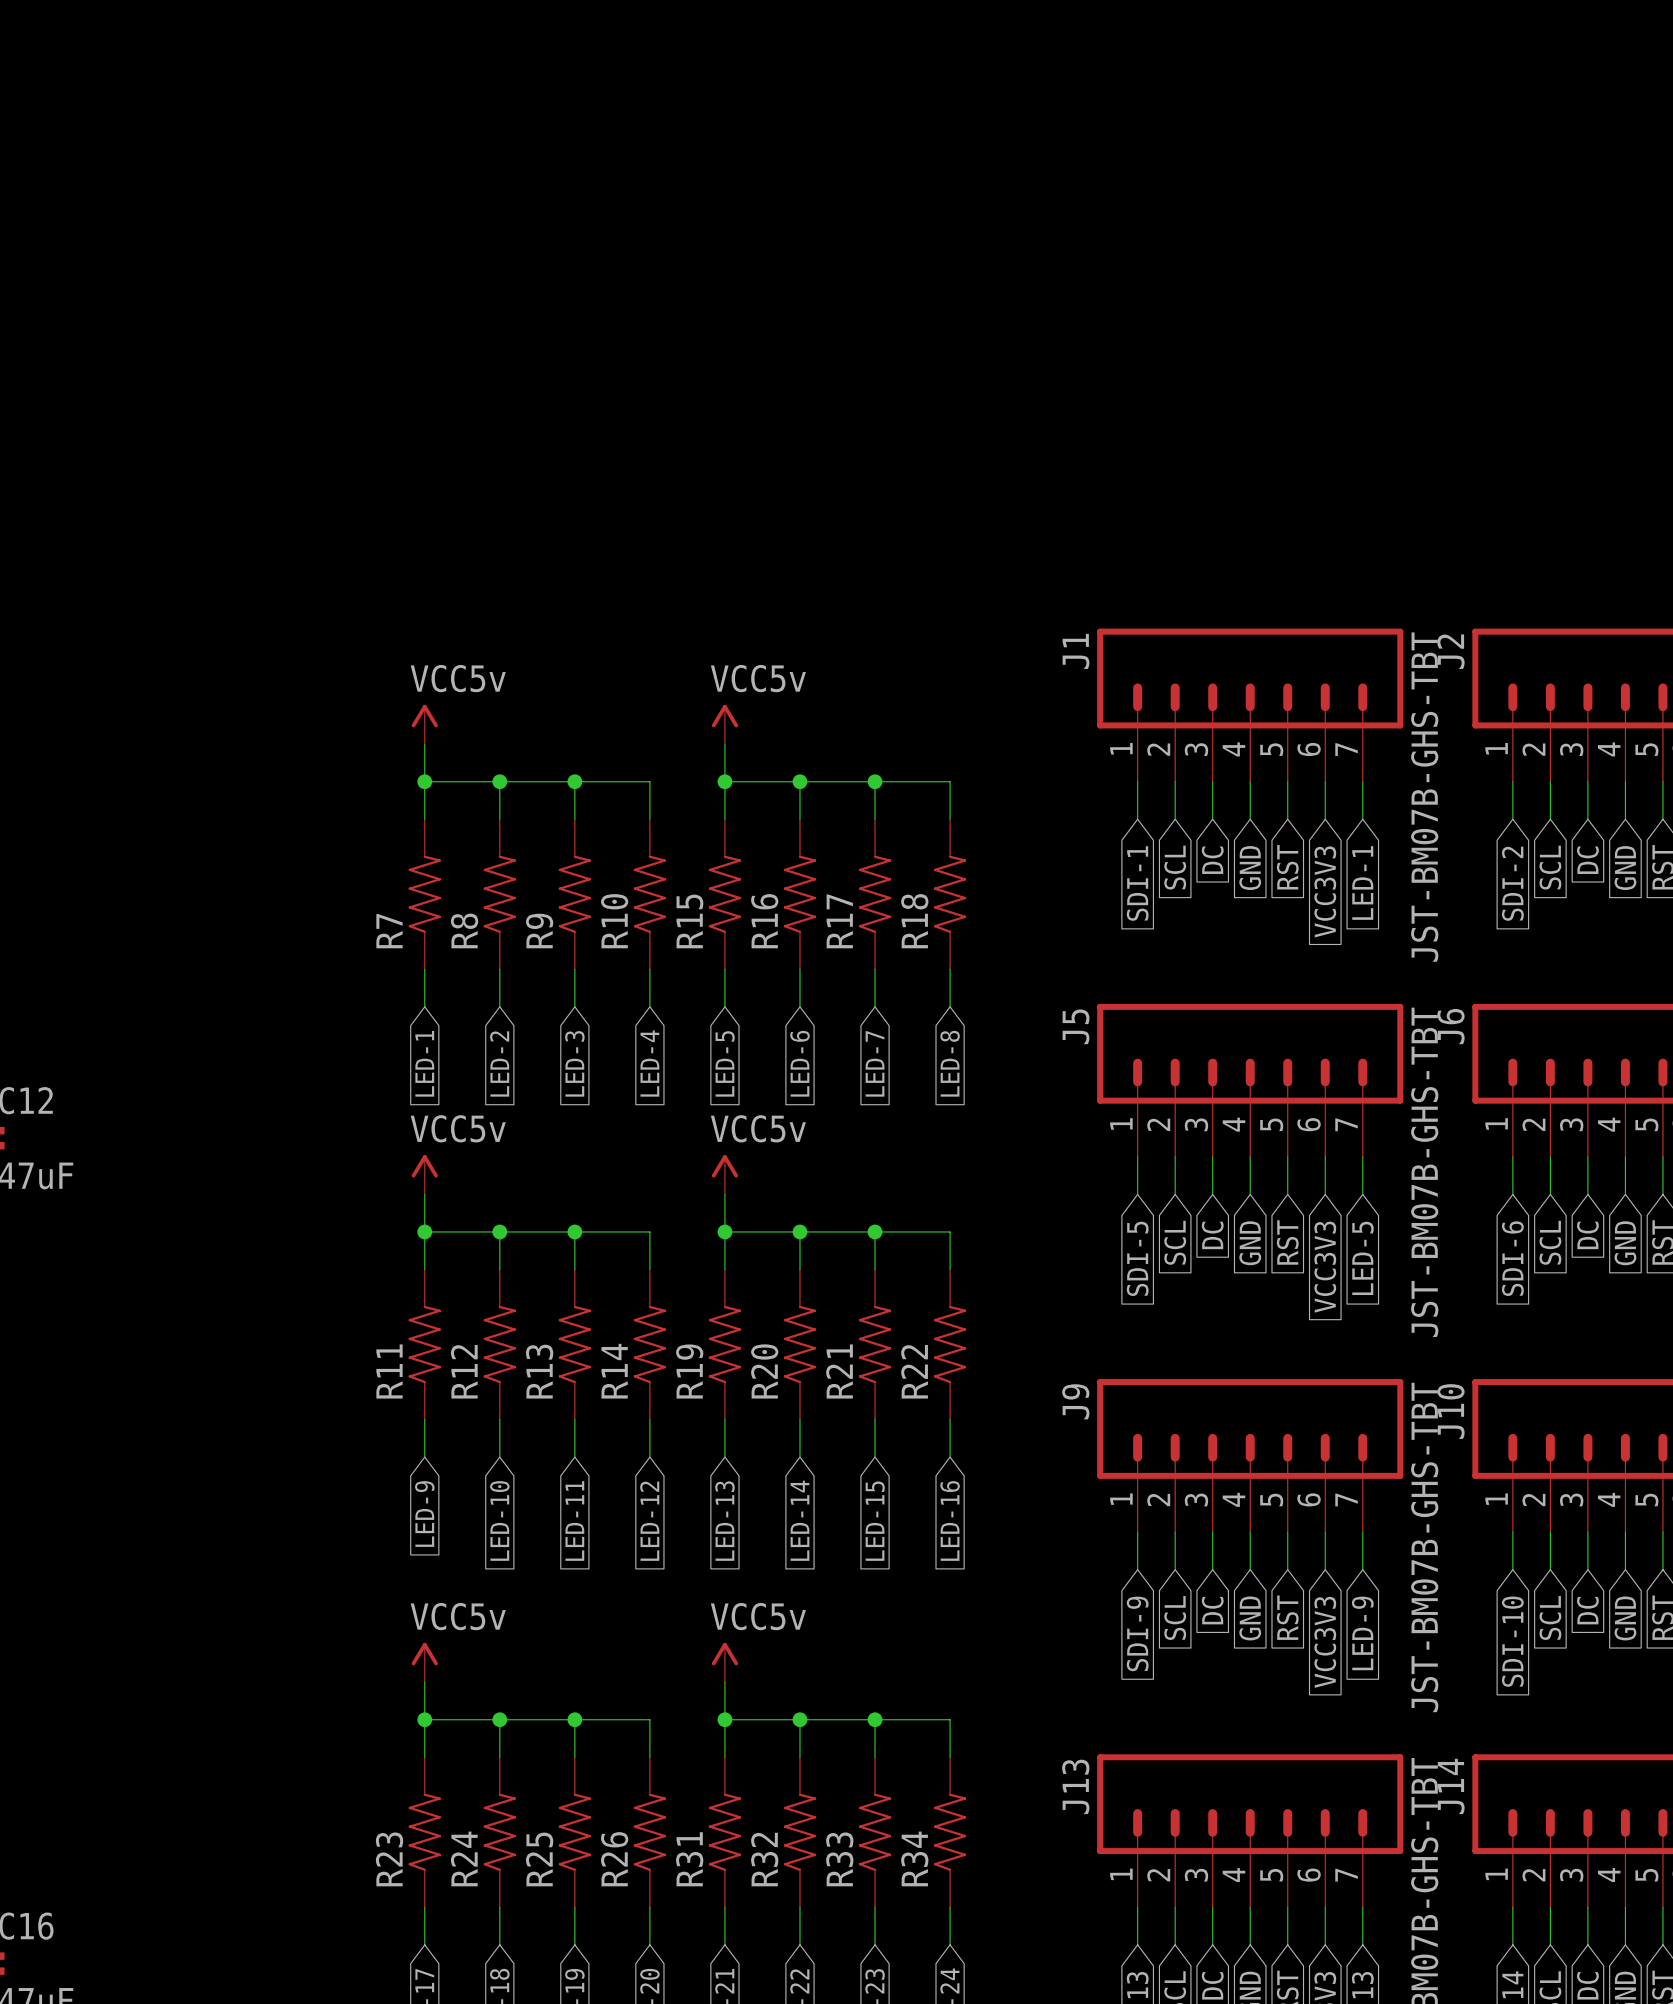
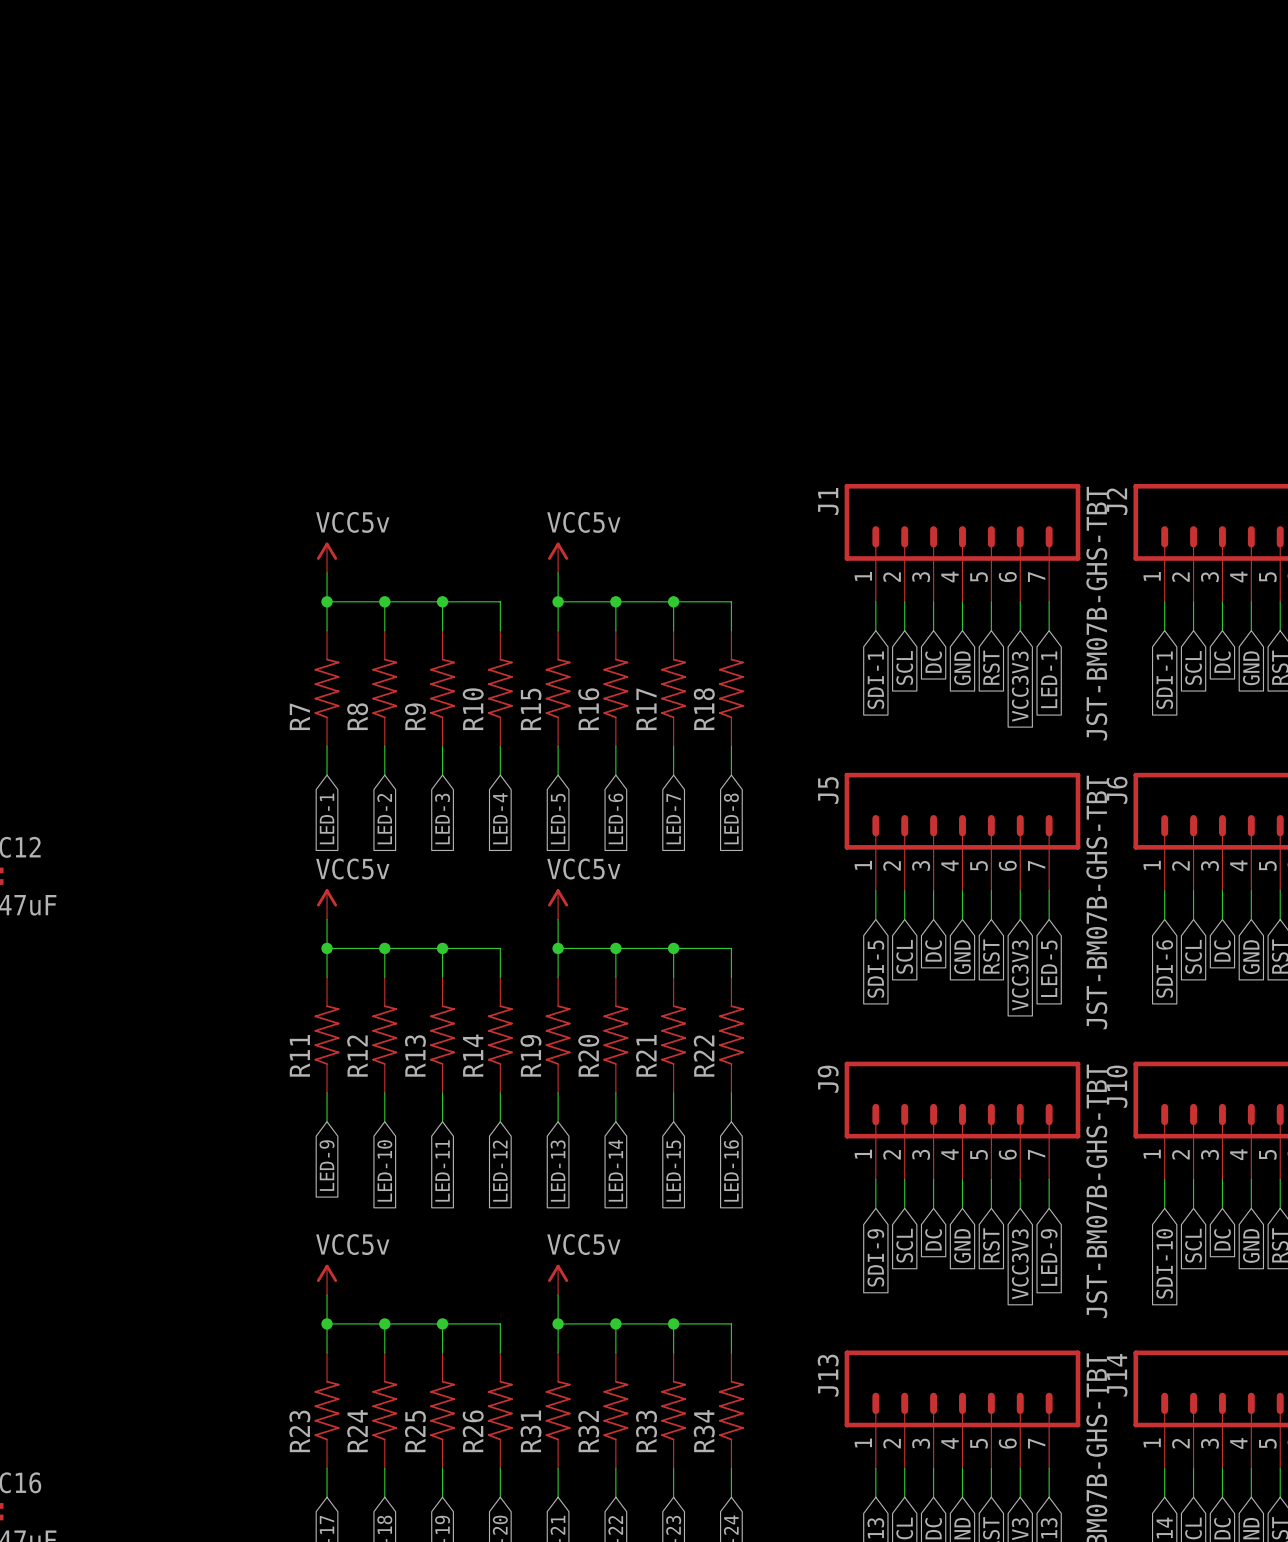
global label: SDI-2 (1512, 883) -> SDI-1 (1164, 680)

